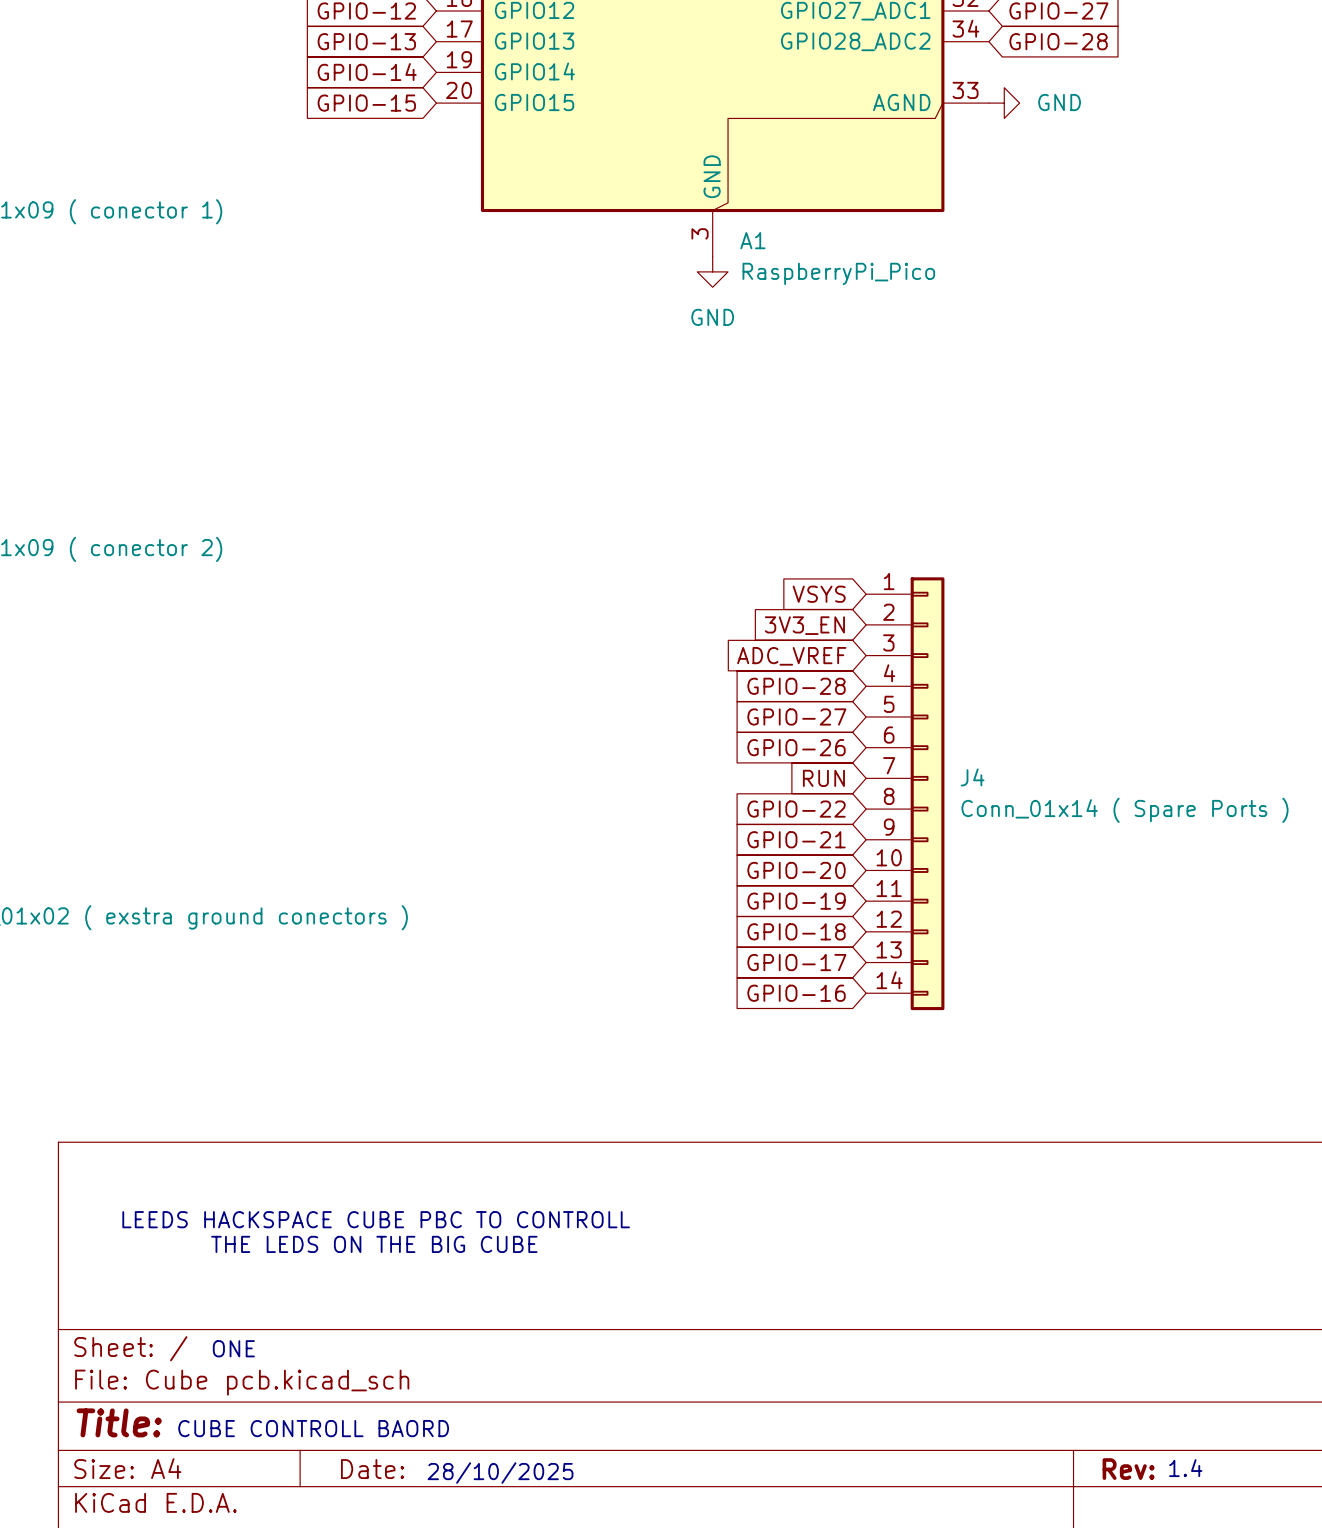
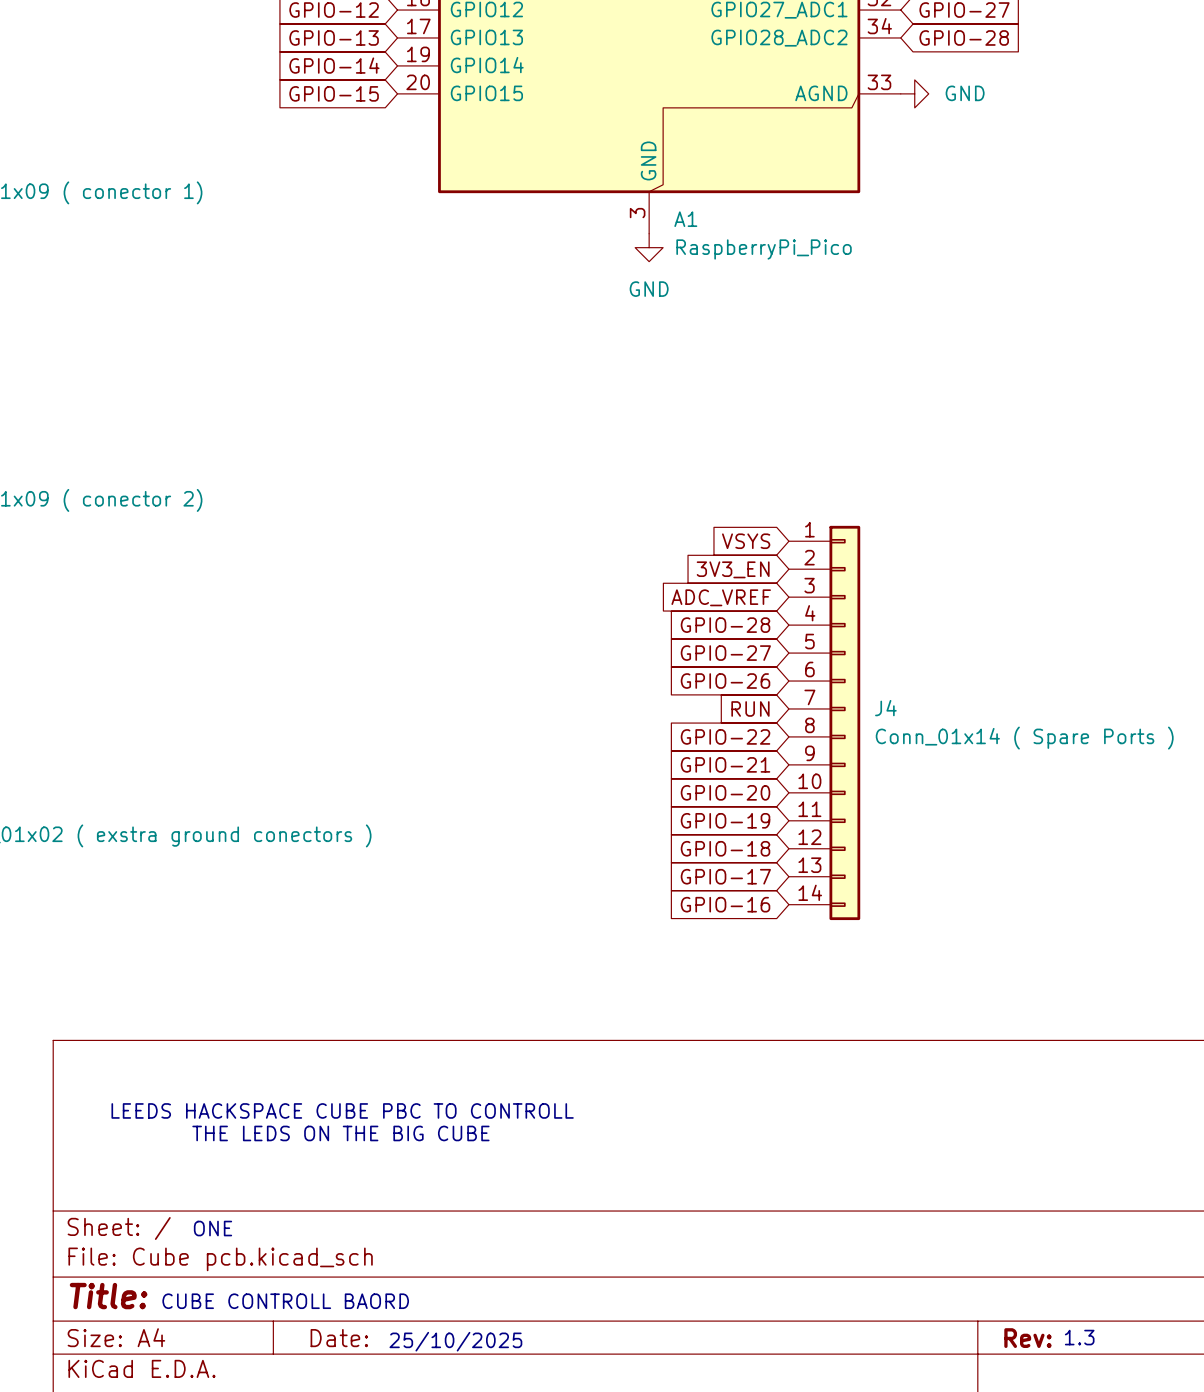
text: 1.4 (1185, 1468) -> 1.3 (1079, 1337)
text: 28/10/2025 (500, 1473) -> 25/10/2025 (455, 1341)

